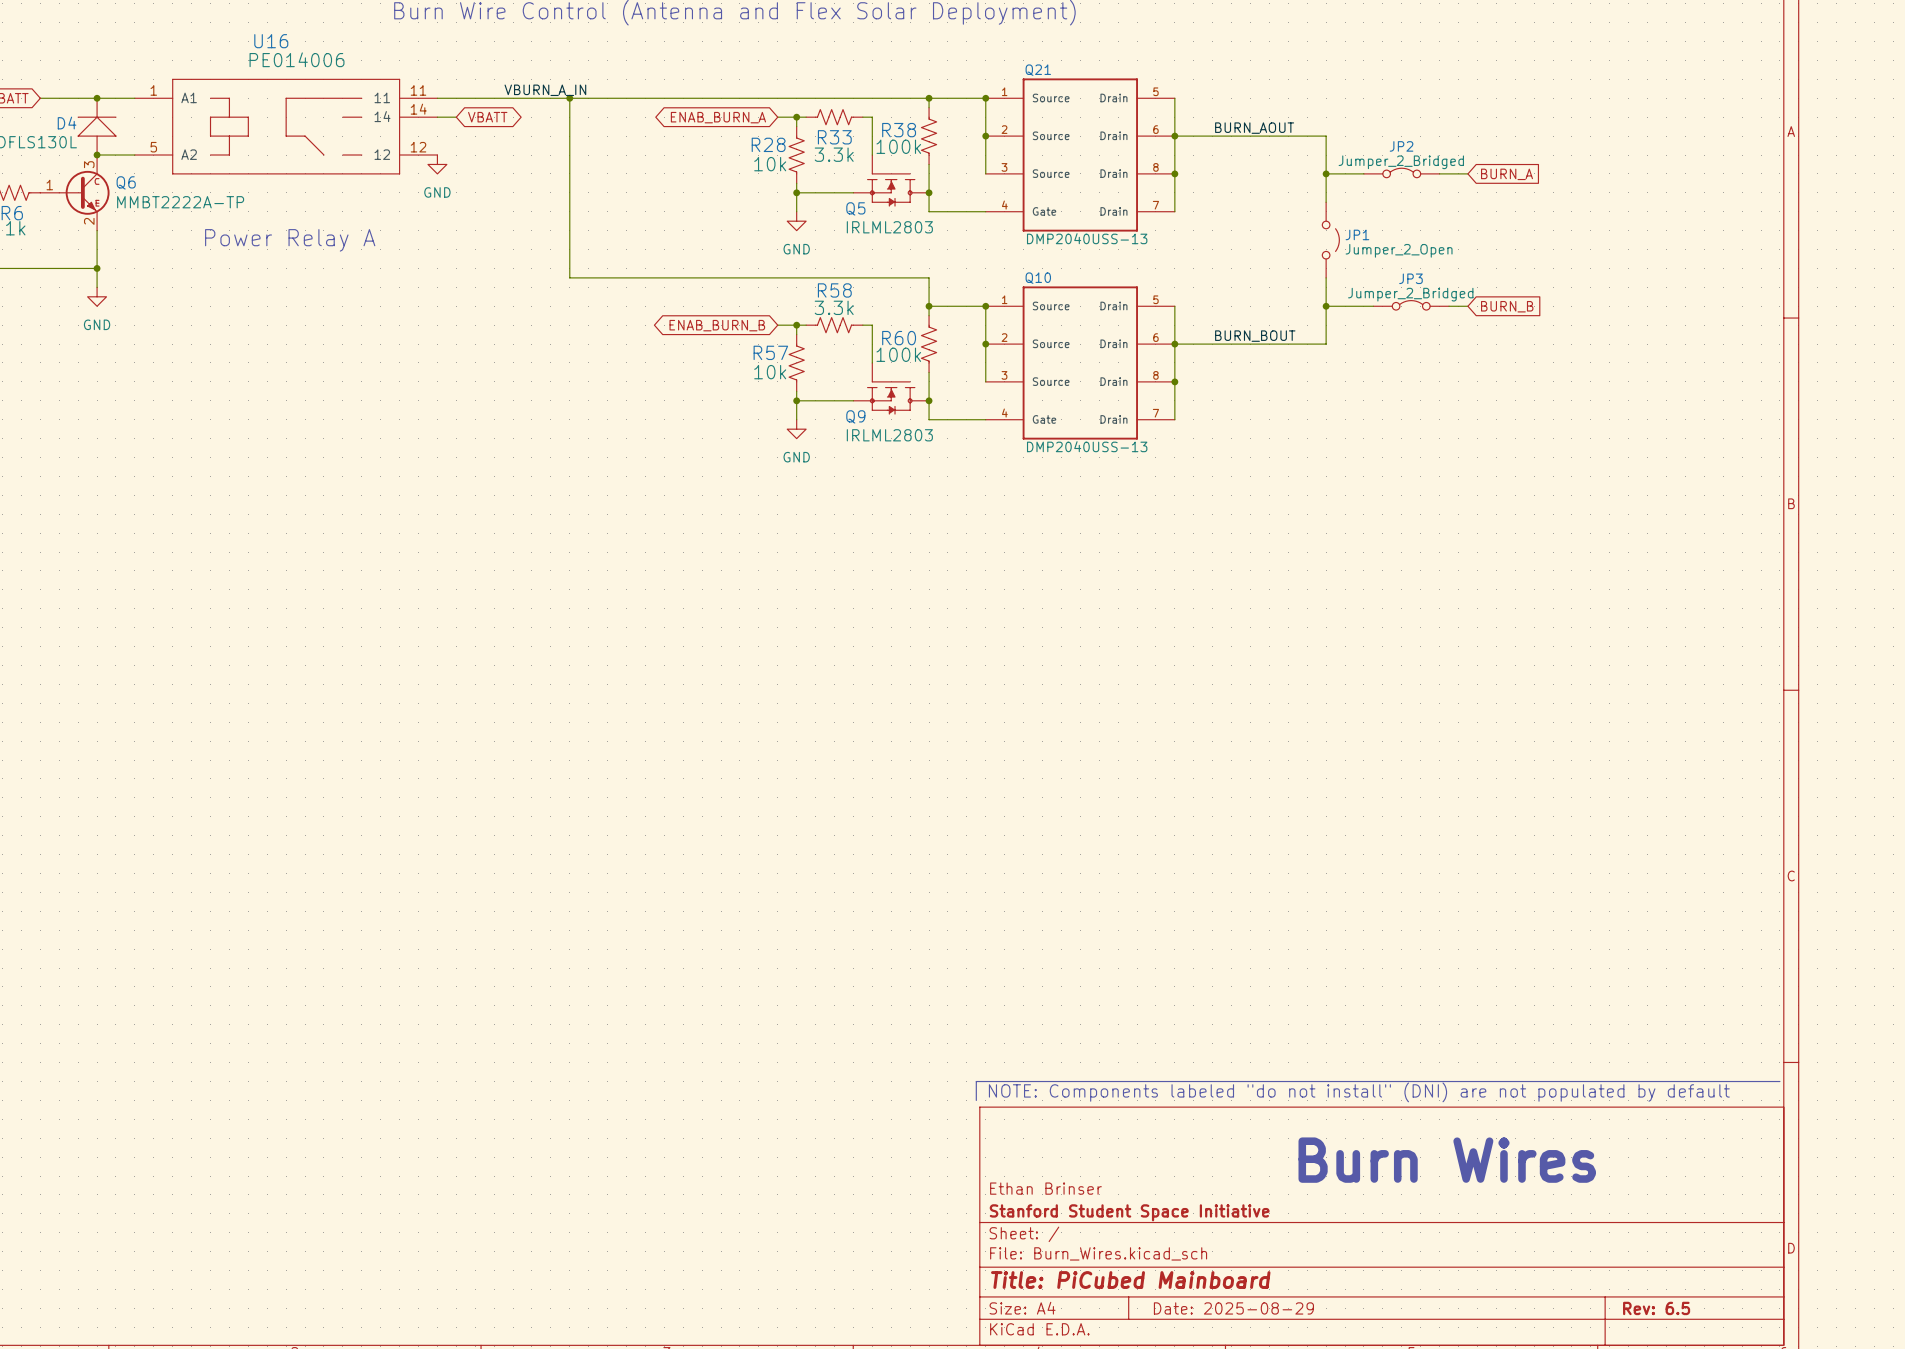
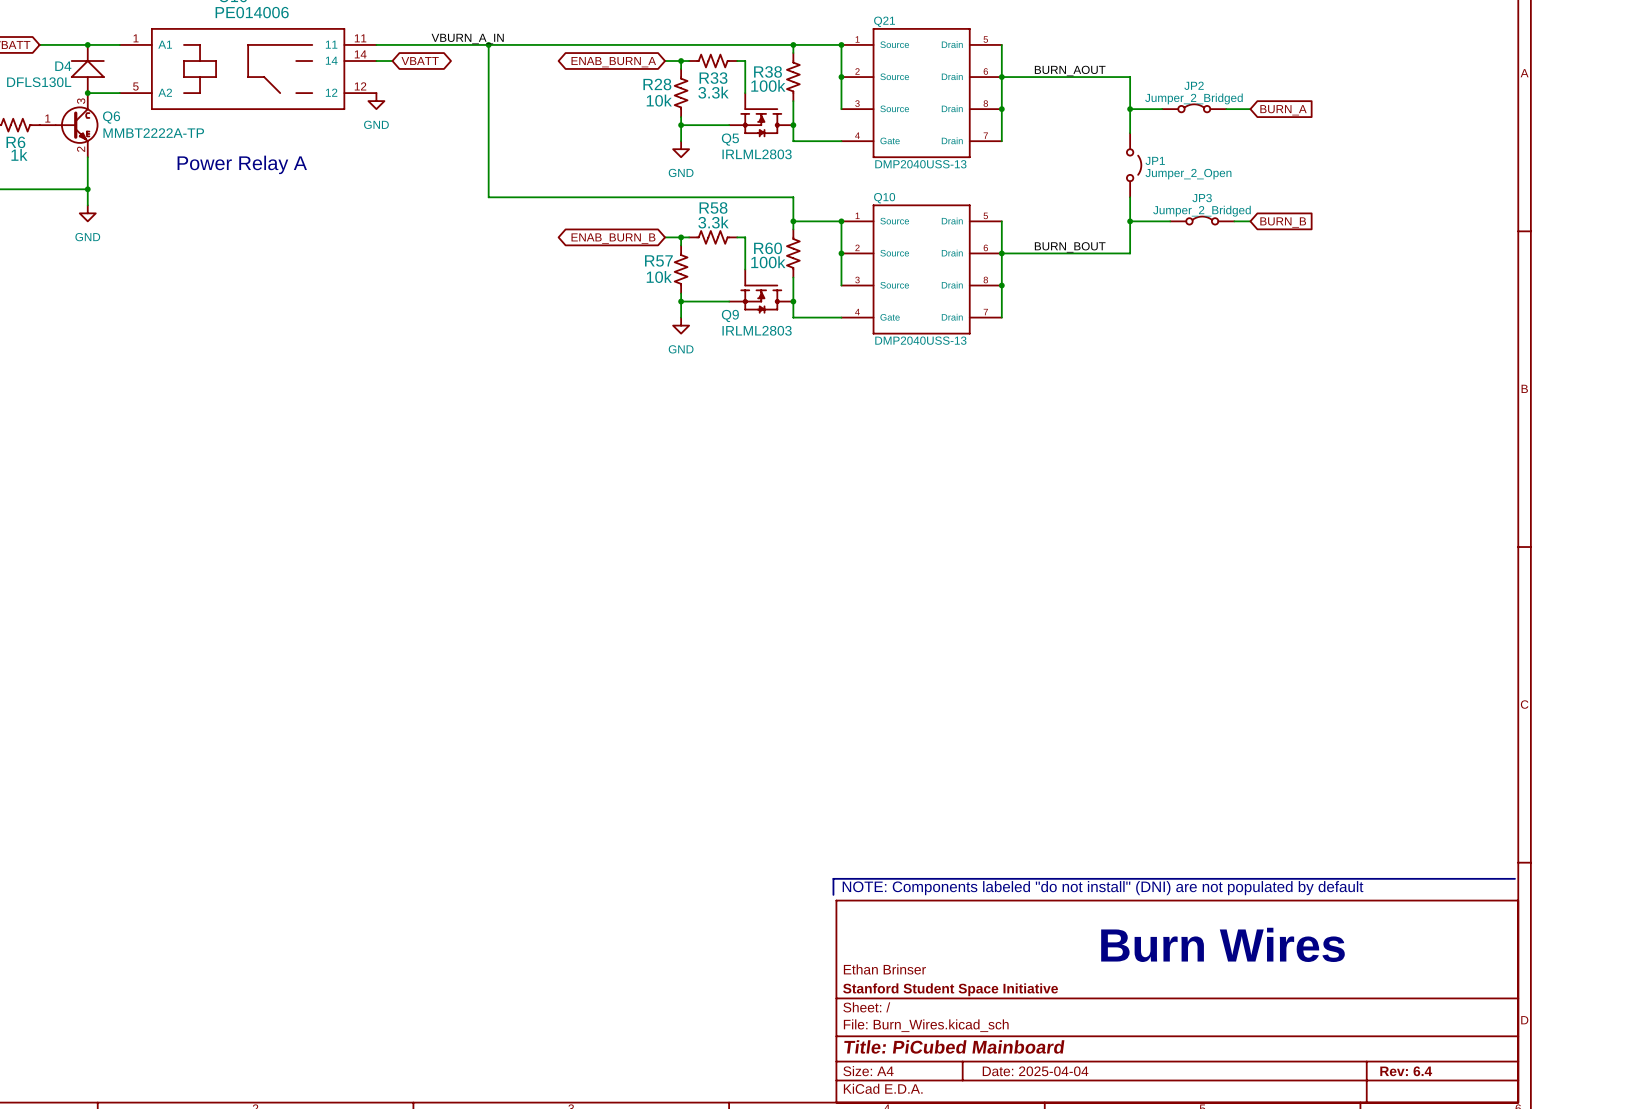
title block: Date: 2025-08-29 (1233, 1308) -> Date: 2025-04-04 (1035, 1071)
title block: Rev: 6.5 (1656, 1308) -> Rev: 6.4 (1406, 1071)

